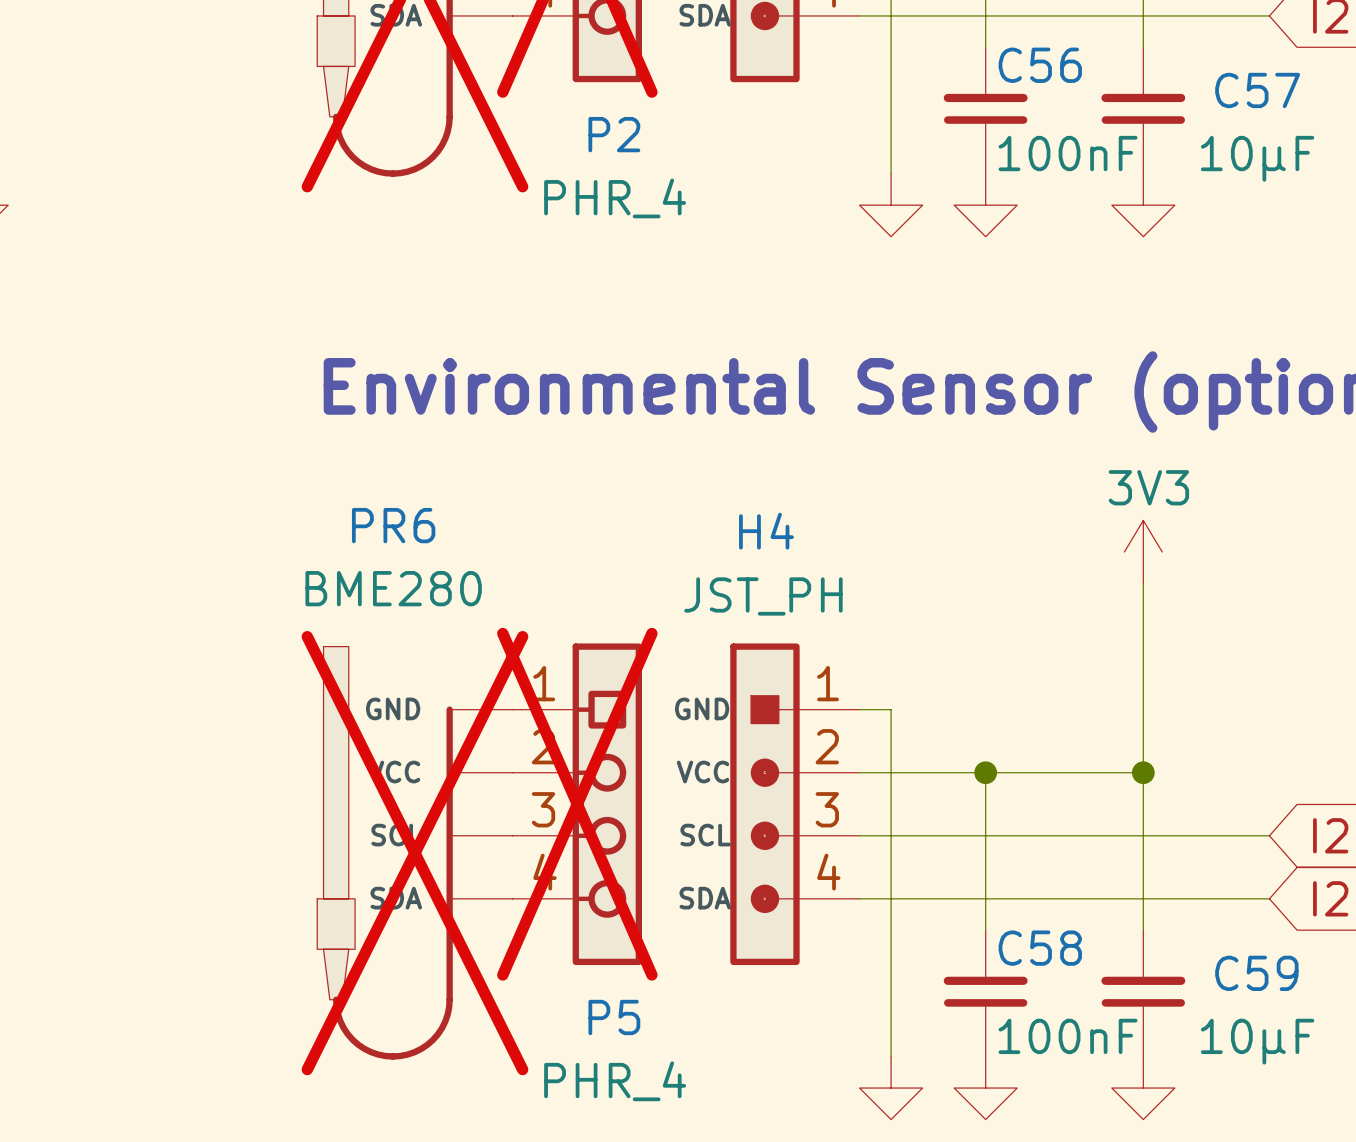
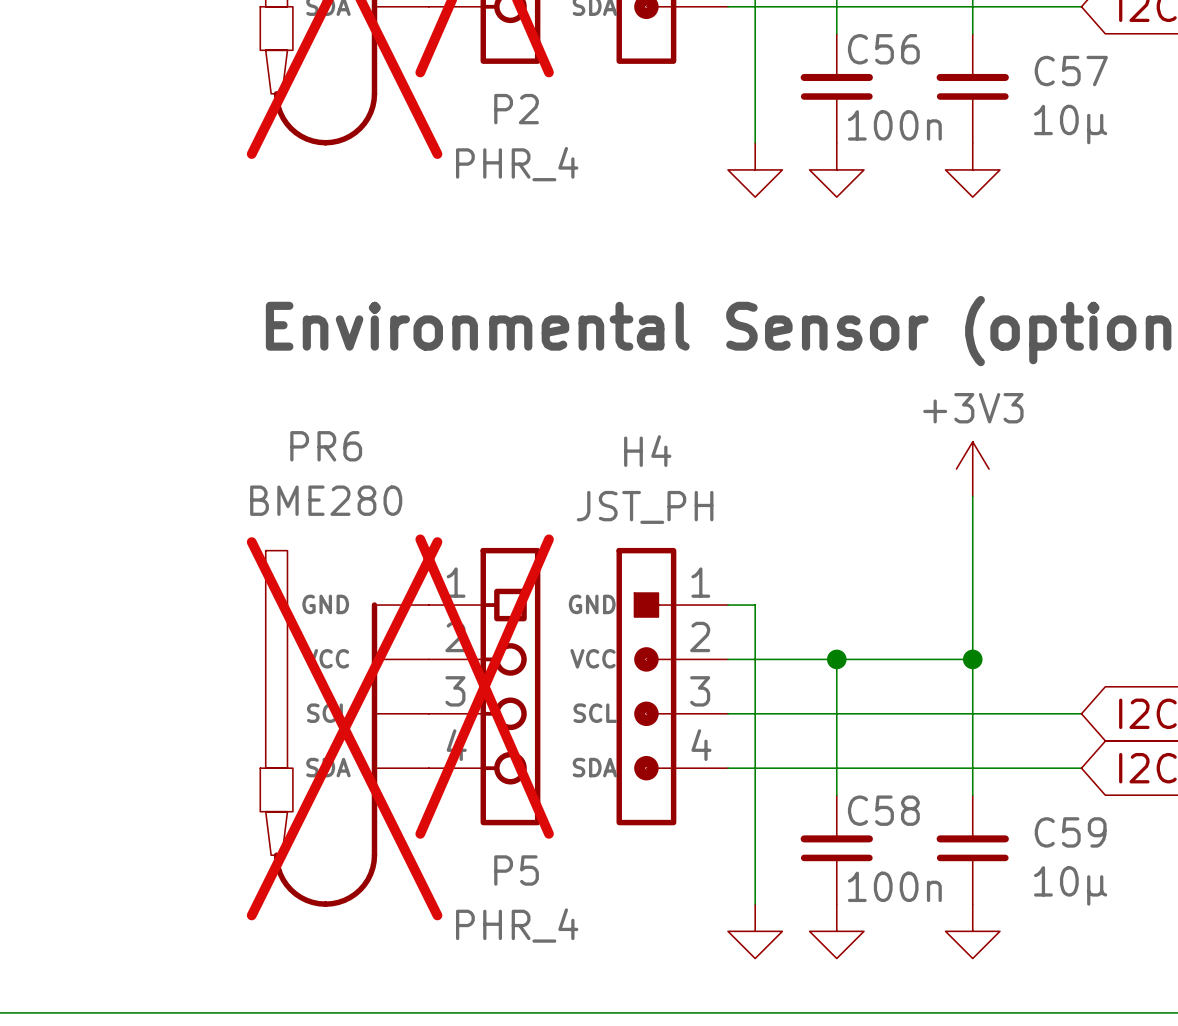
C56 value: 100nF (1068, 153) -> 100n (894, 125)
C57 value: 10μF (1257, 158) -> 10μ (1070, 124)
power symbol: 3V3 (1143, 552) -> +3V3 (972, 469)
C58 value: 100nF (1068, 1036) -> 100n (894, 886)
C59 value: 10μF (1257, 1041) -> 10μ (1070, 885)

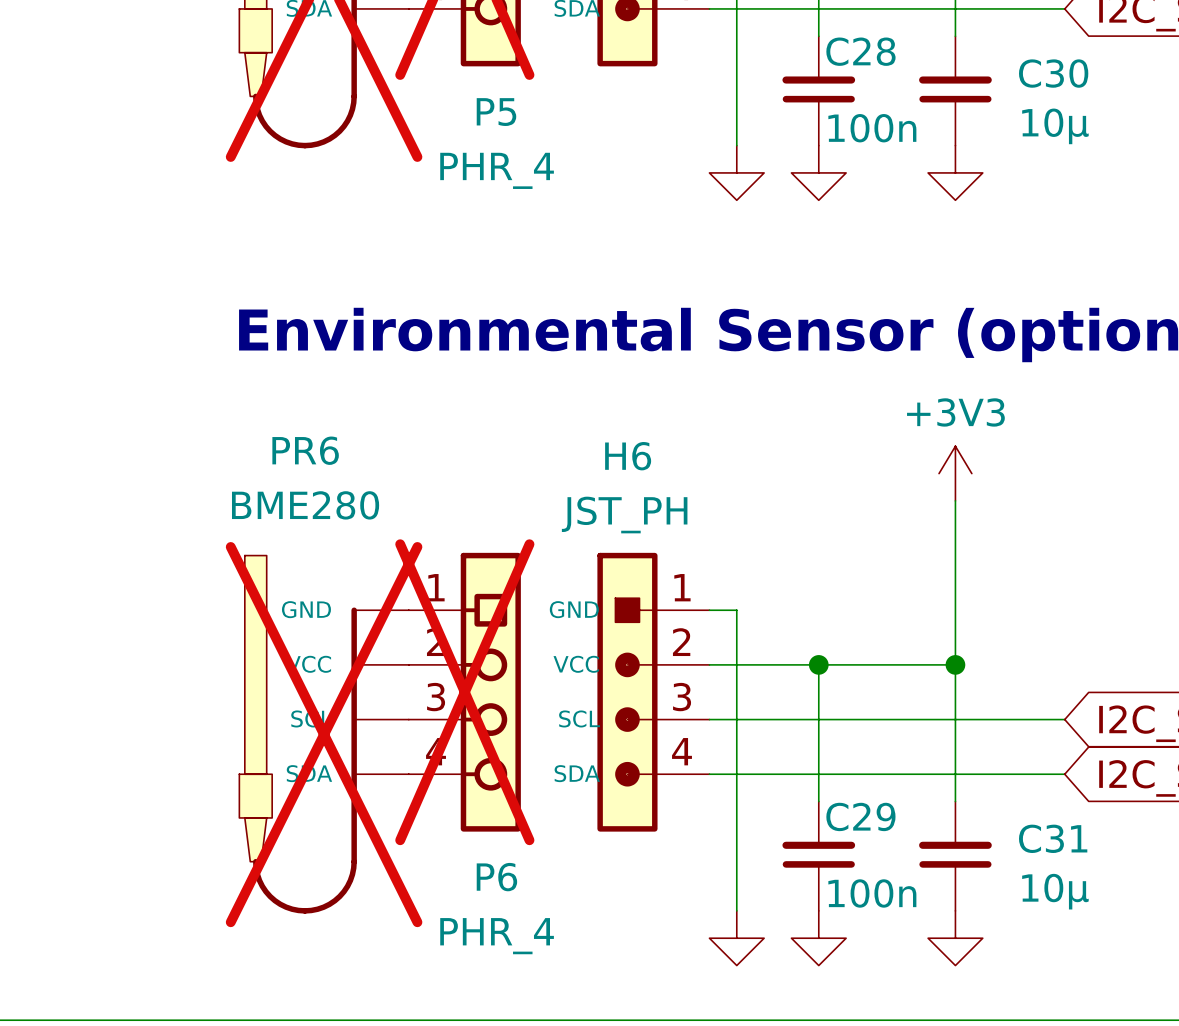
C56 name: C56 (883, 49) -> C28 (860, 51)
C57 name: C57 (1071, 71) -> C30 (1053, 73)
P2 name: P2 (516, 109) -> P5 (496, 112)
H4 name: H4 (647, 451) -> H6 (628, 456)
C58 name: C58 (883, 810) -> C29 (860, 816)
C59 name: C59 (1070, 832) -> C31 (1053, 838)
P5 name: P5 (516, 870) -> P6 (496, 877)

